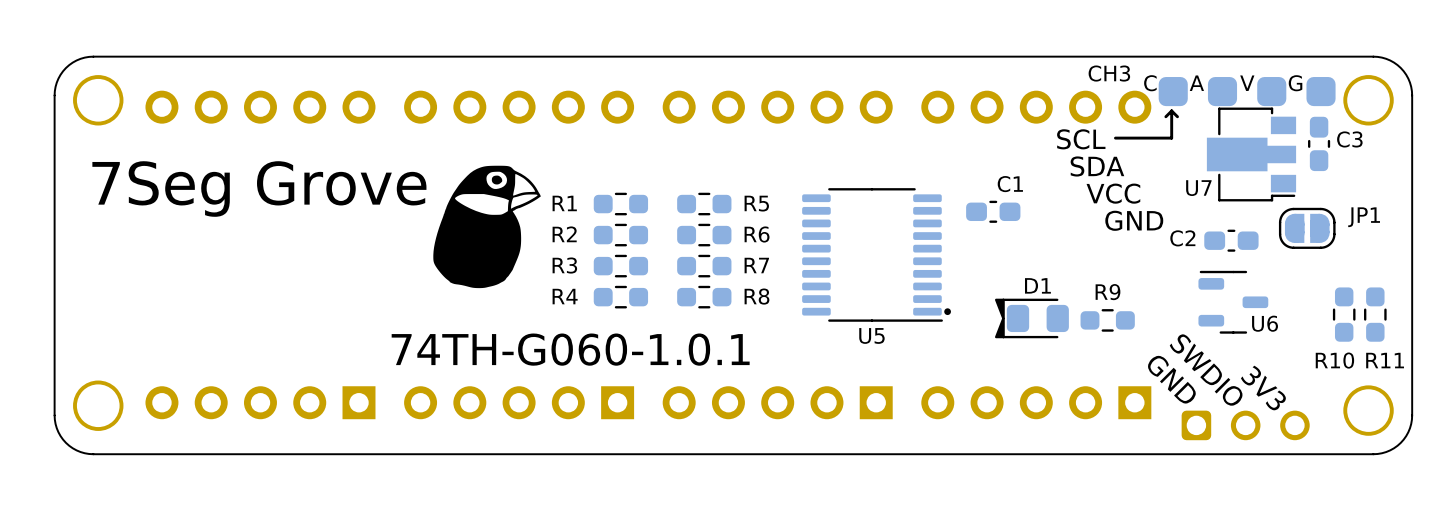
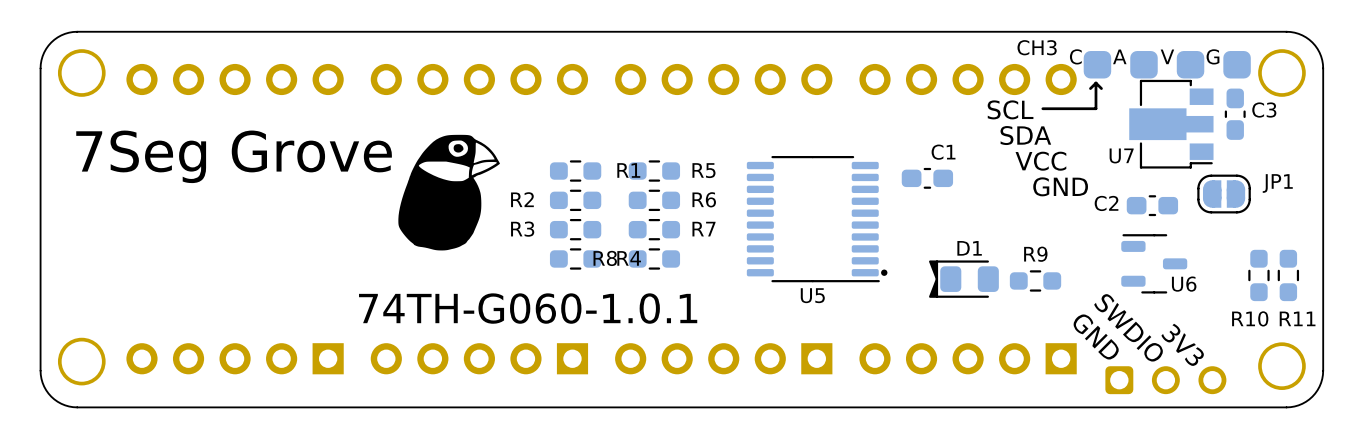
R1 name position: R1 (564, 203) -> R1 (628, 170)
R4 name position: R4 (565, 296) -> R4 (629, 258)
R8 name position: R8 (756, 296) -> R8 (605, 258)

